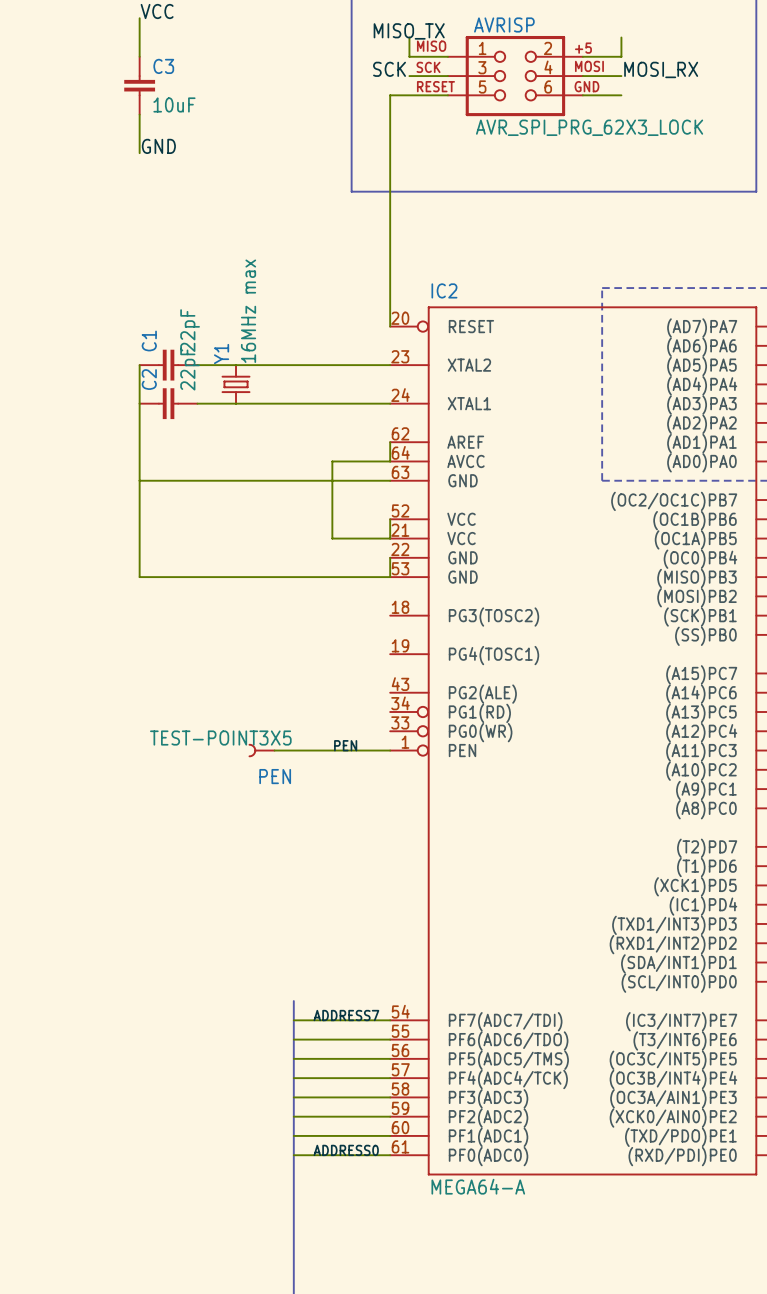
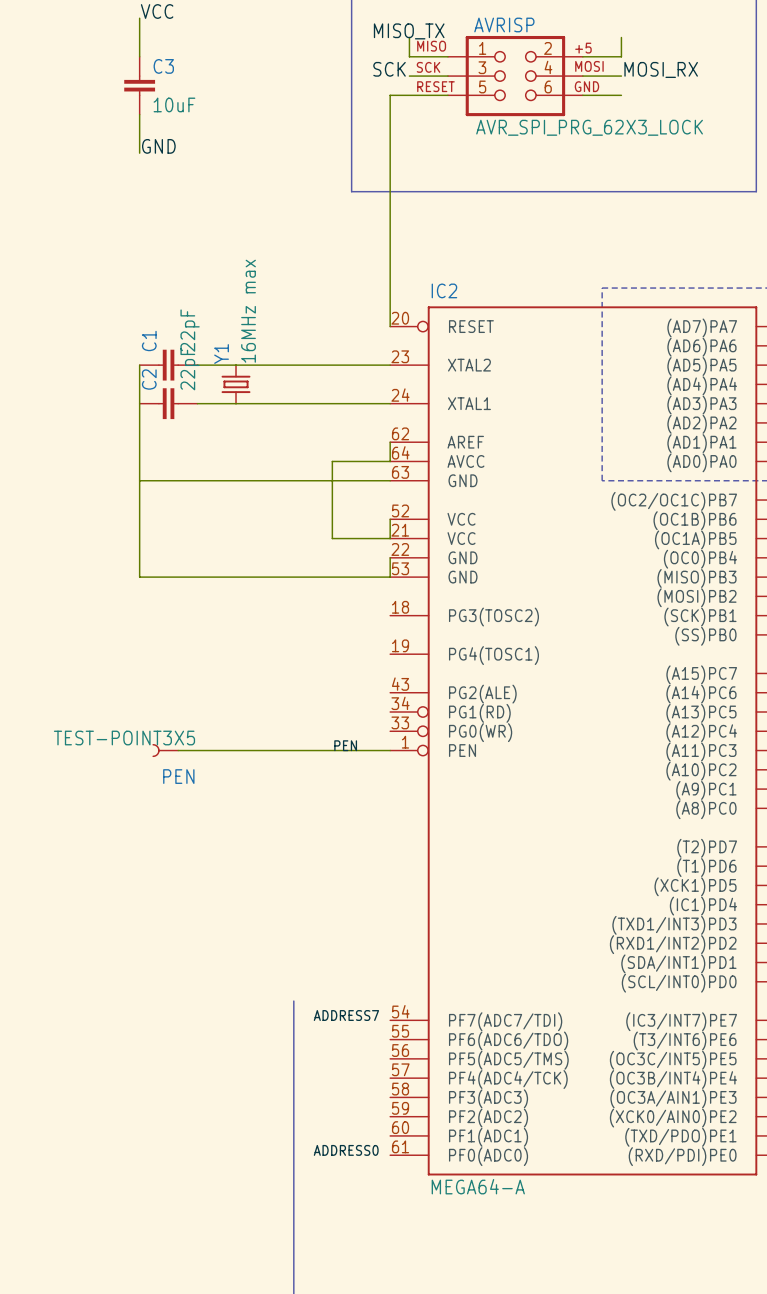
wire: none -> (178, 750) (274, 750)
PEN position: (262, 750) -> (165, 750)
wire: (293, 1020) (390, 1020) -> none
wire: (293, 1039) (390, 1039) -> none
wire: (293, 1058) (390, 1058) -> none
wire: (293, 1078) (390, 1078) -> none
wire: (293, 1097) (390, 1097) -> none
wire: (293, 1116) (390, 1116) -> none
wire: (293, 1135) (390, 1135) -> none
wire: (293, 1155) (390, 1155) -> none

